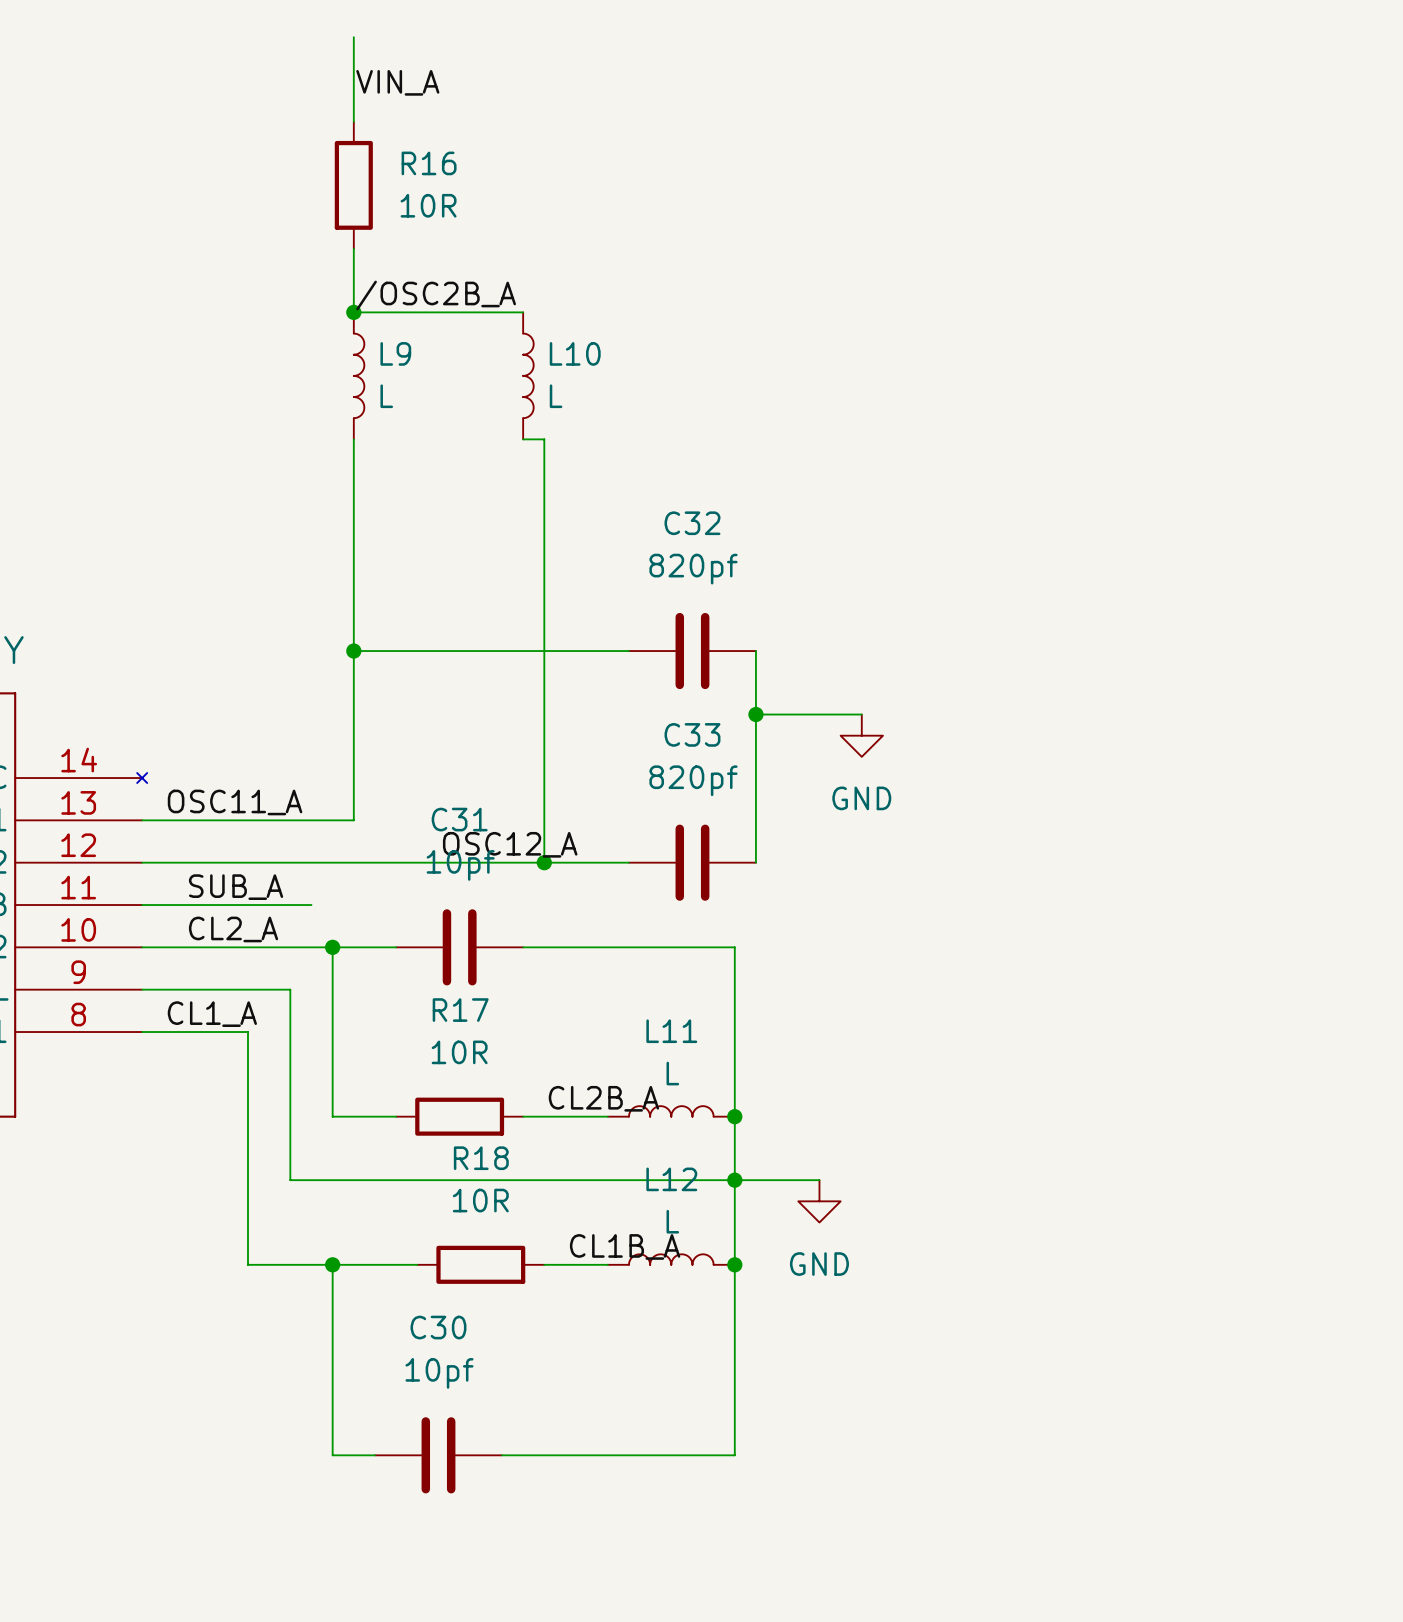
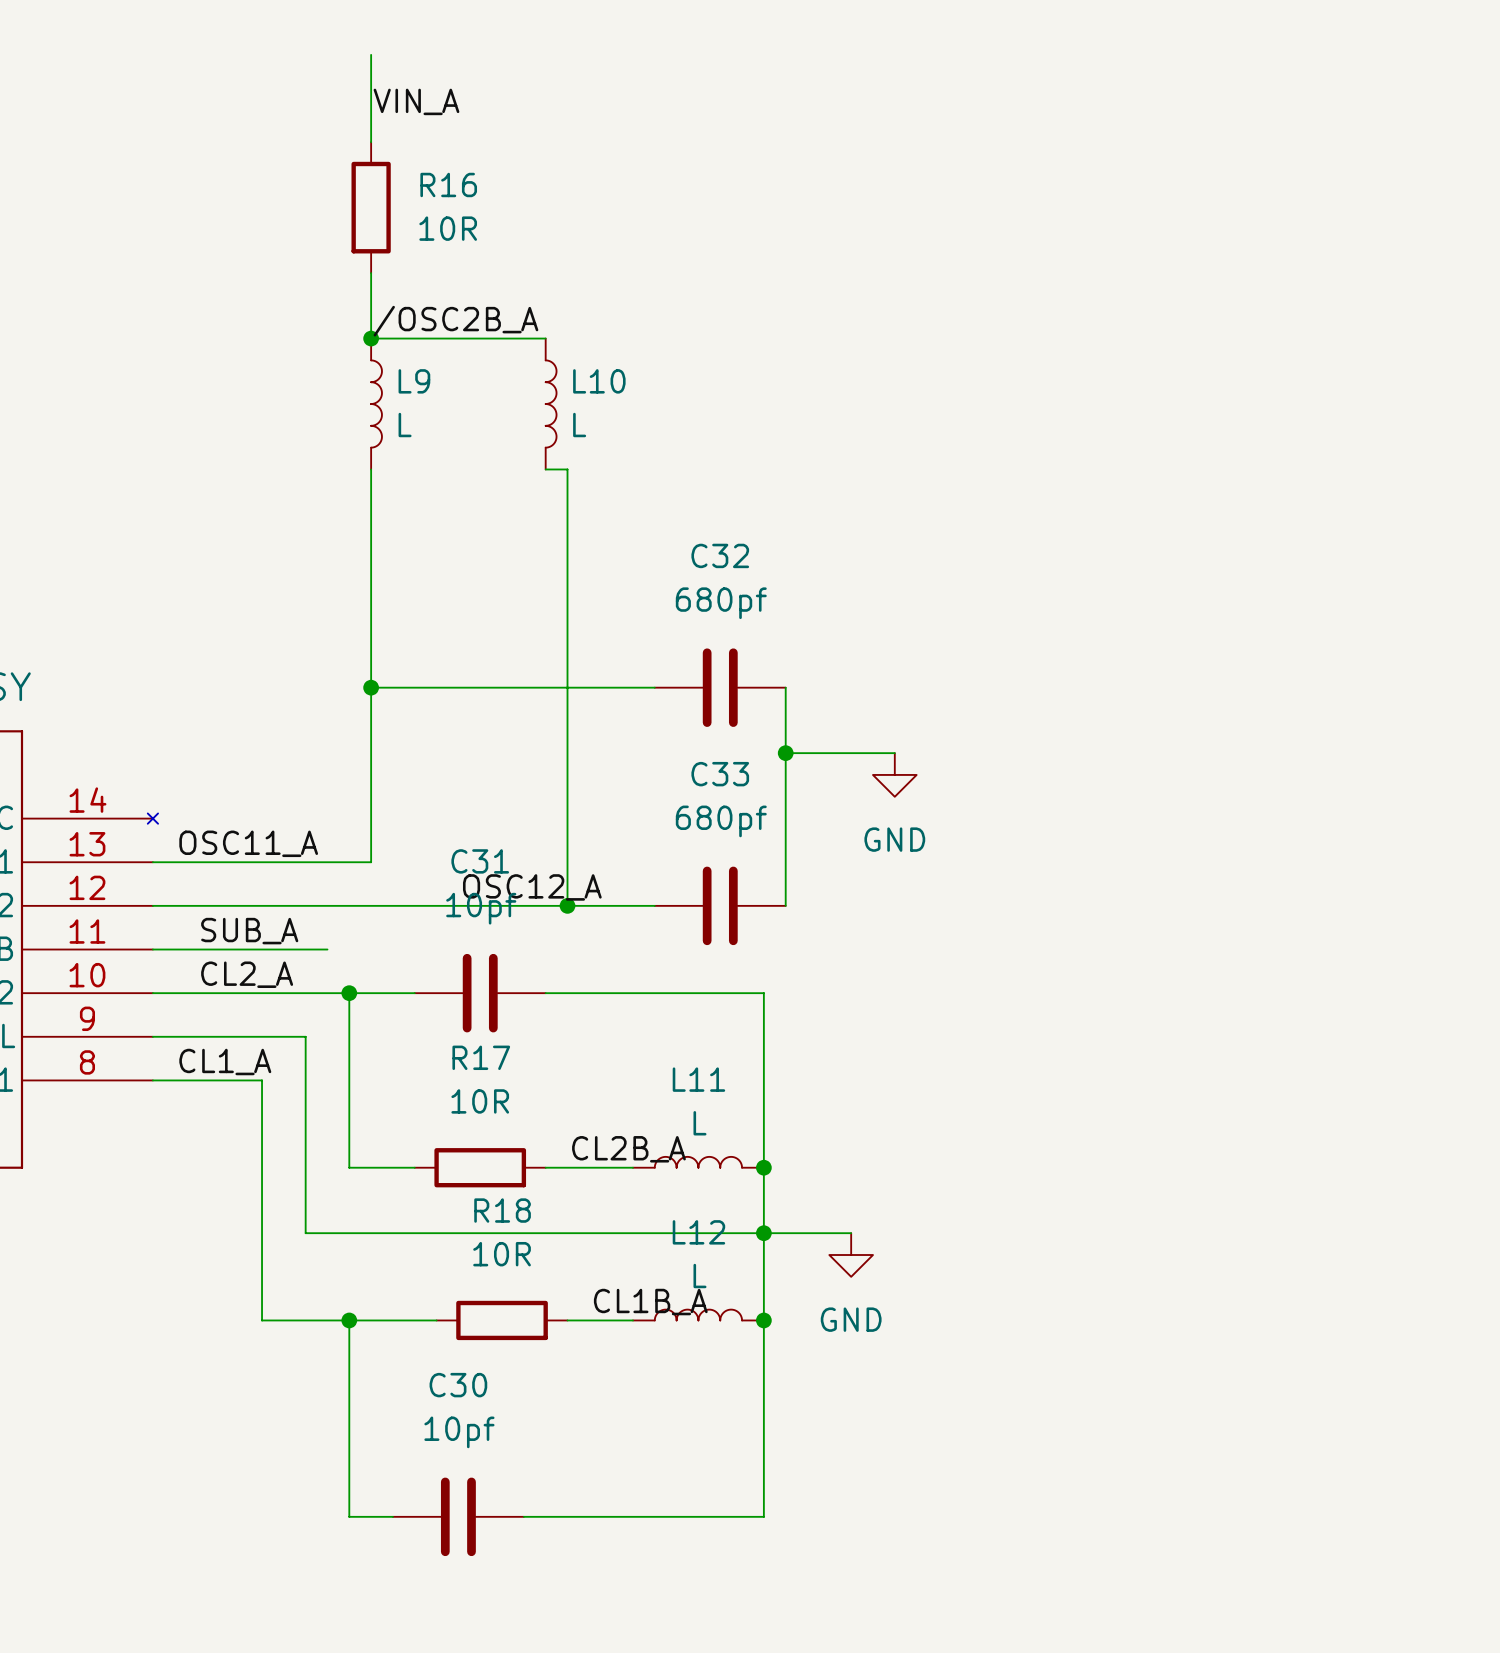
C32 value: 820pf (693, 569) -> 680pf (721, 603)
C33 value: 820pf (693, 780) -> 680pf (721, 821)

